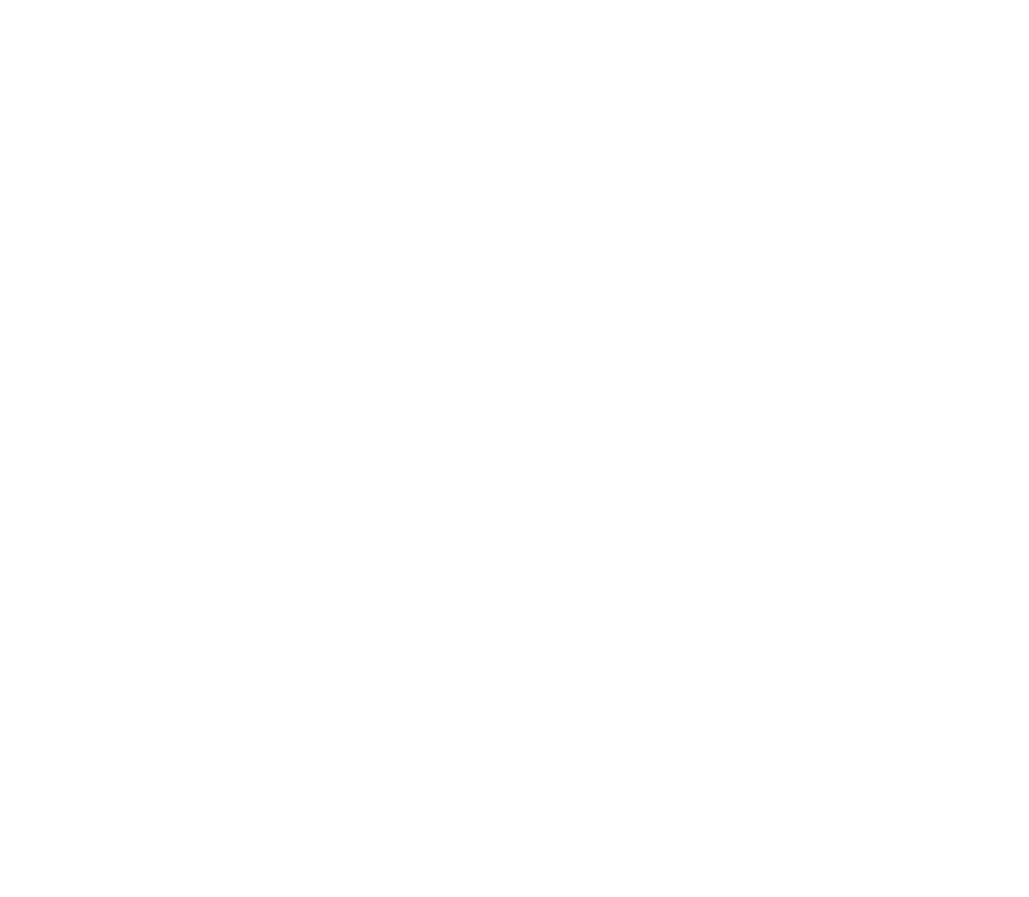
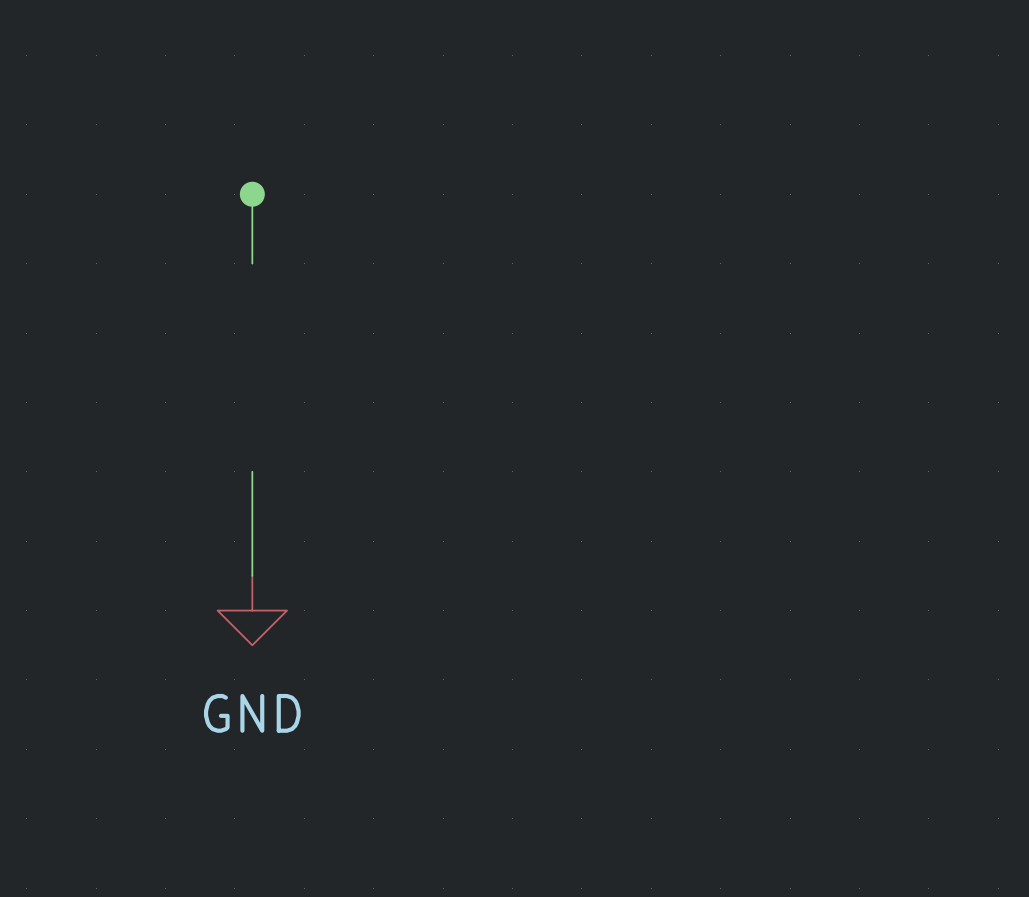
wire: none -> (252, 194) (252, 263)
junction: none -> (252, 194)
wire: none -> (252, 471) (252, 575)
power symbol: none -> GND (252, 610)

